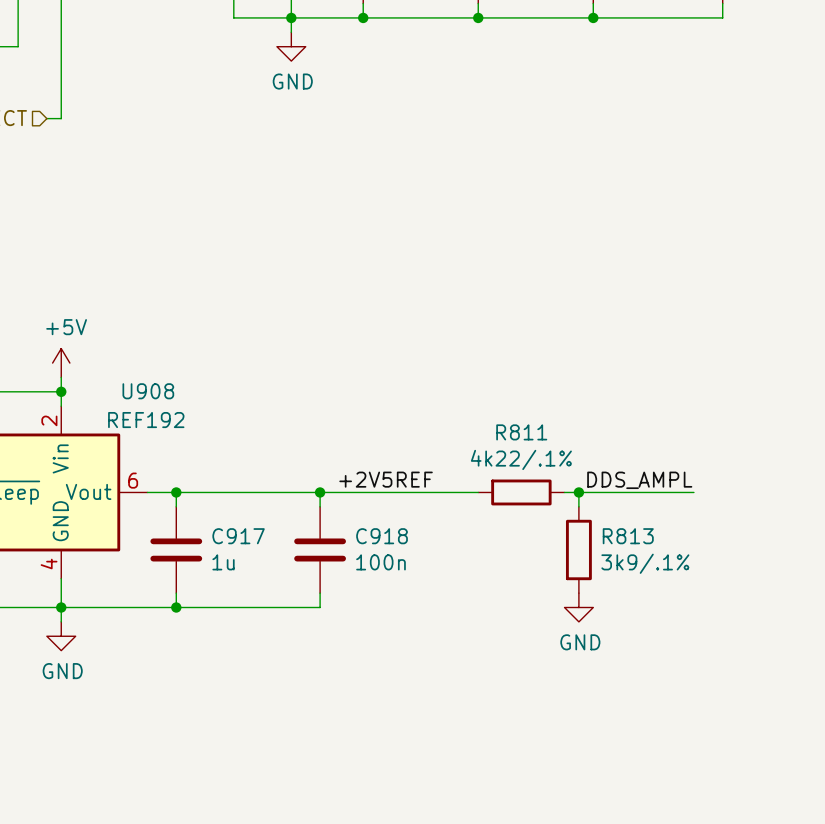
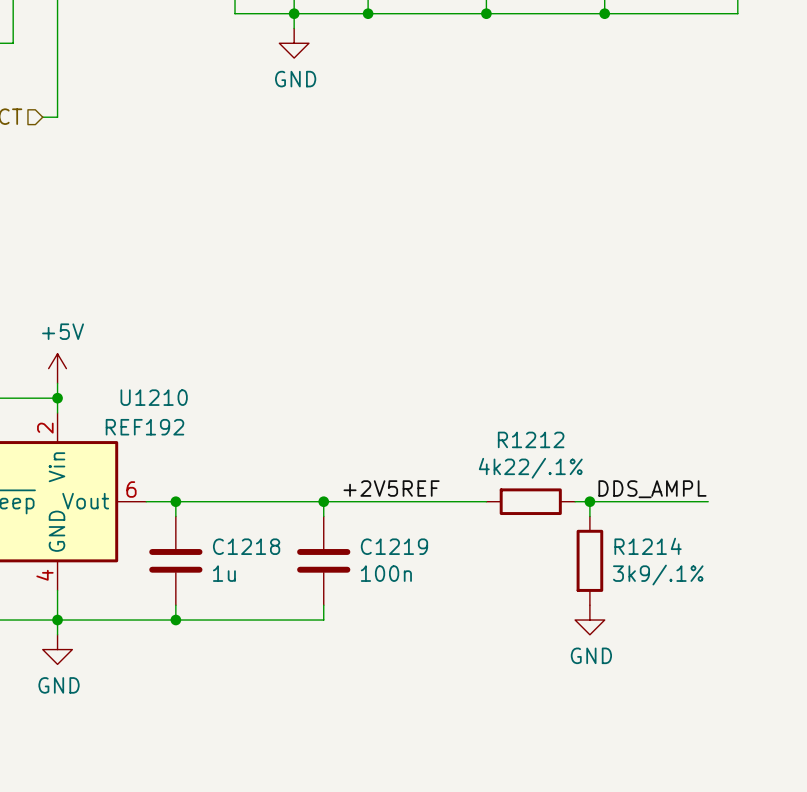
U908 name: U908 (148, 391) -> U1210 (154, 397)
R811 name: R811 (521, 432) -> R1212 (531, 439)
C917 name: C917 (238, 536) -> C1218 (246, 546)
C918 name: C918 (382, 536) -> C1219 (394, 546)
R813 name: R813 (628, 536) -> R1214 (648, 546)

